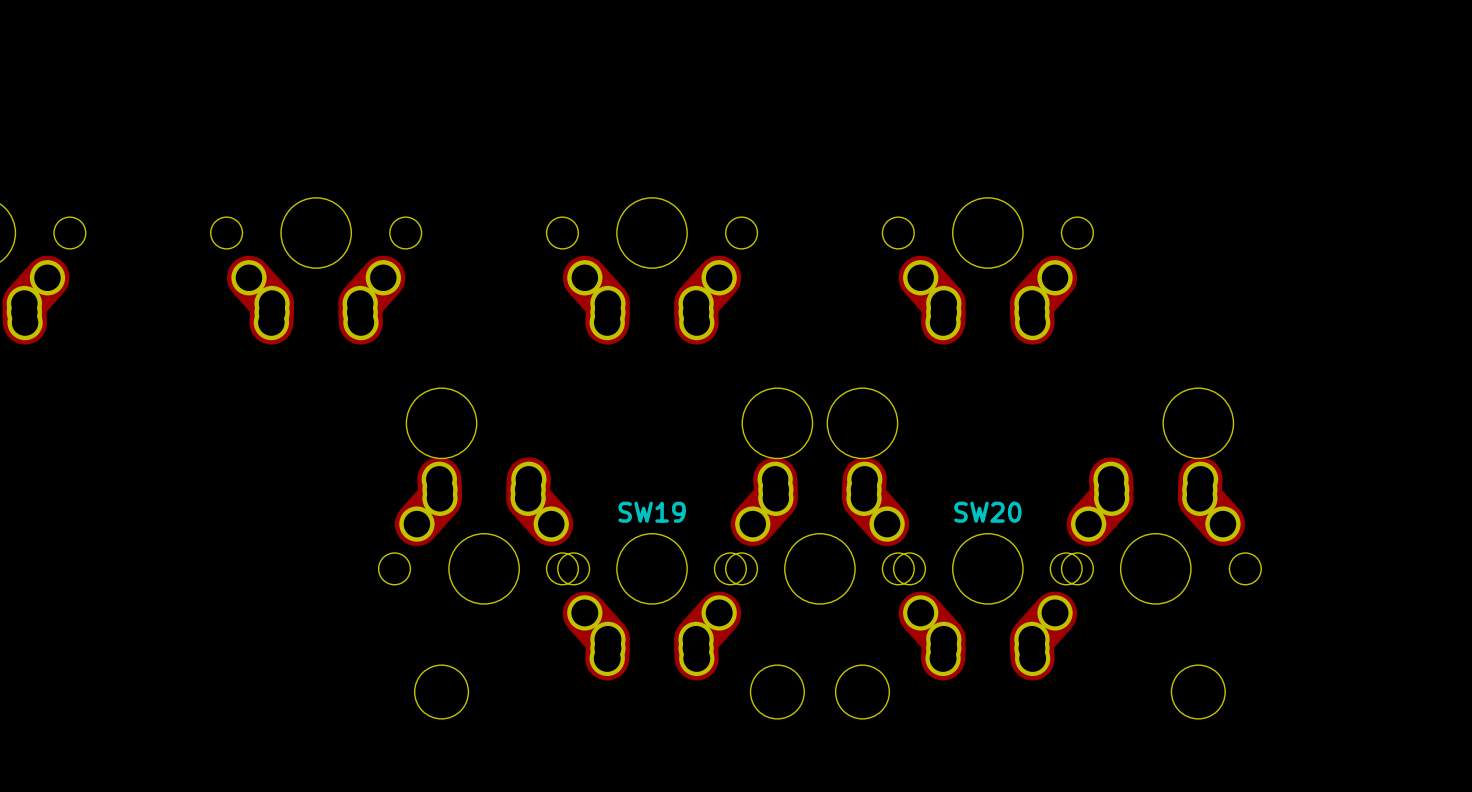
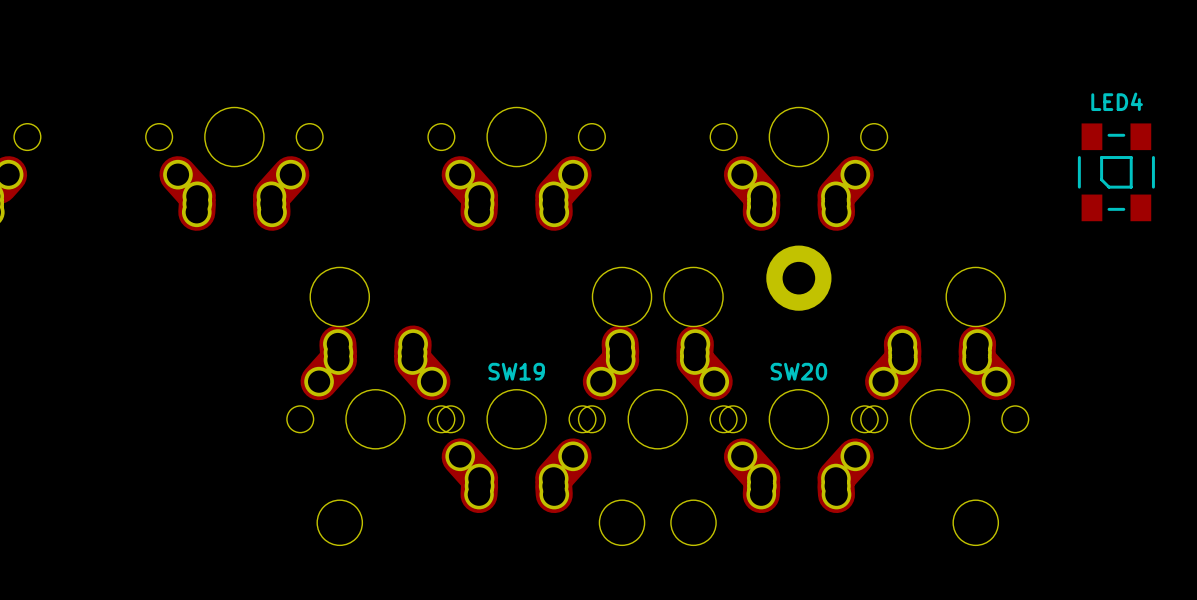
LED4: none -> (1116, 172)
part: none -> (798, 278)

